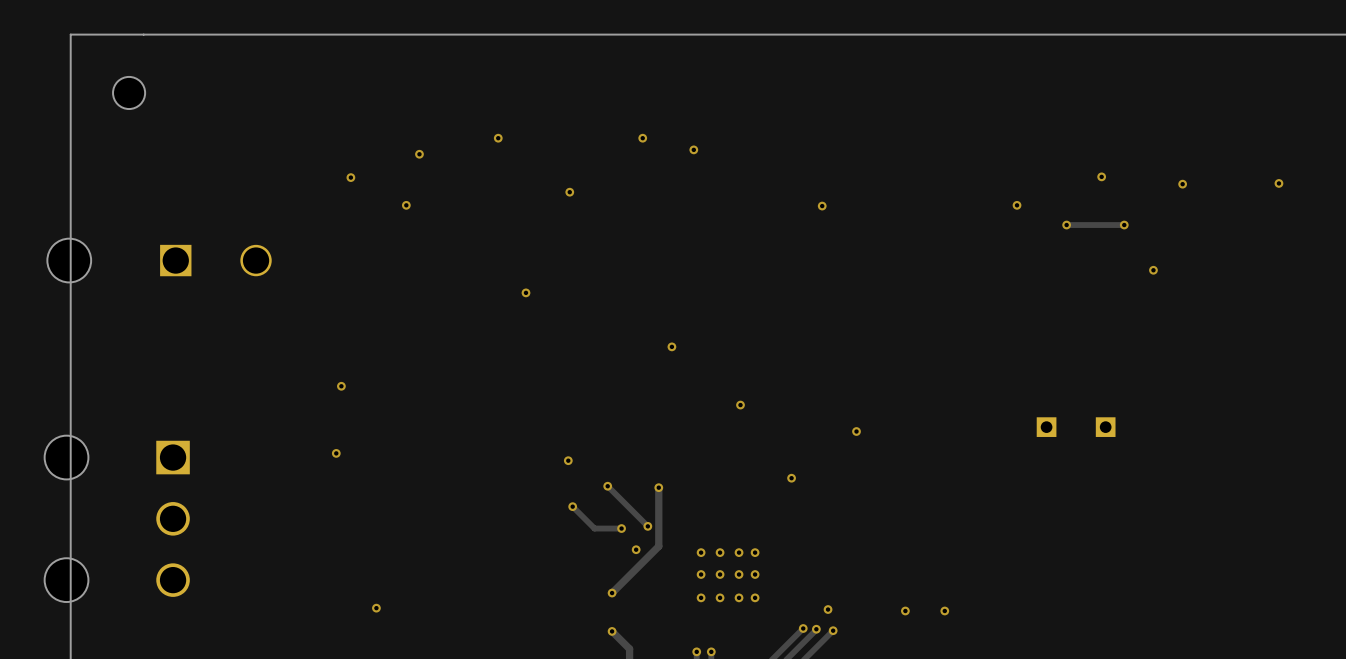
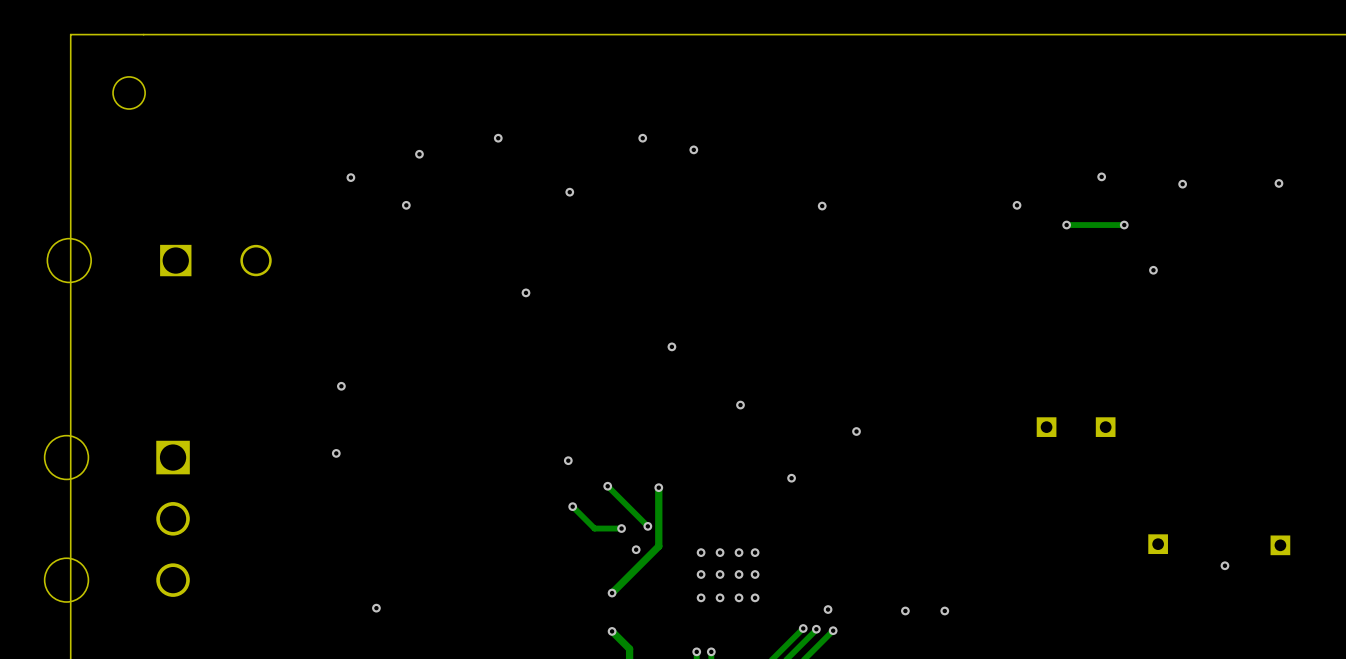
part: none -> (1158, 544)
part: none -> (1280, 545)
via: none -> (1224, 565)

